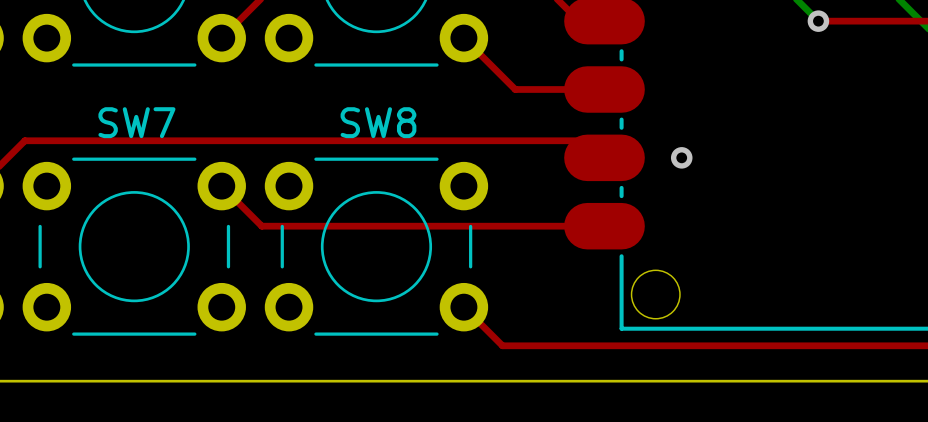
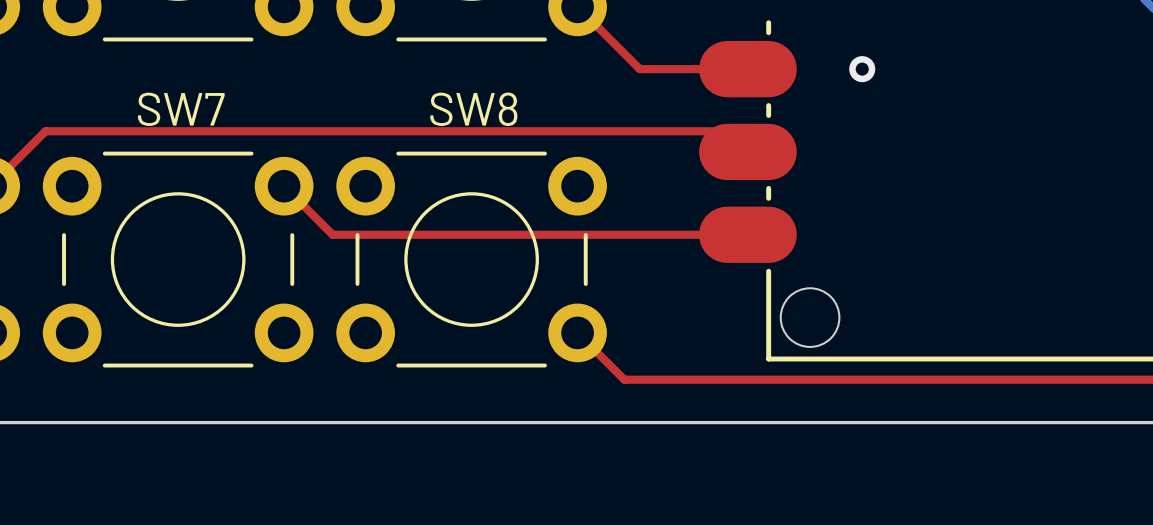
via position: (681, 157) -> (862, 69)

